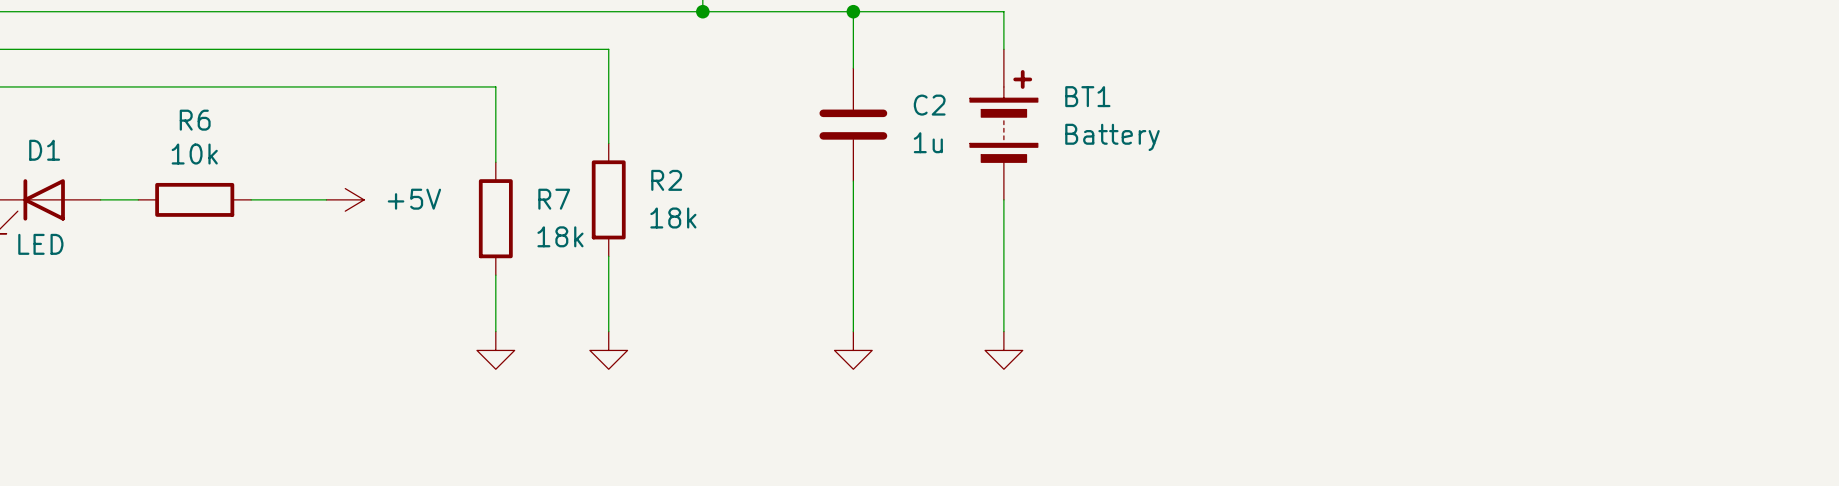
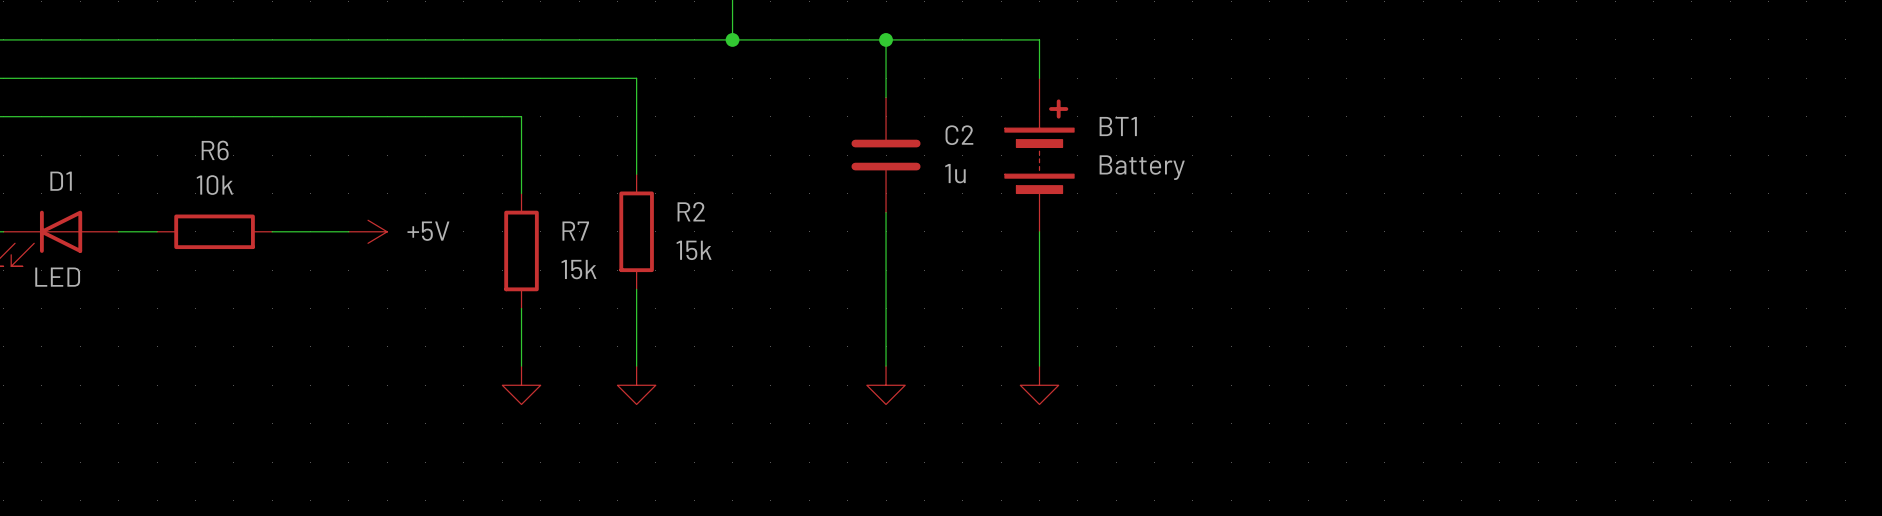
R2 value: 18k (673, 218) -> 15k (694, 250)
R7 value: 18k (560, 236) -> 15k (578, 269)

